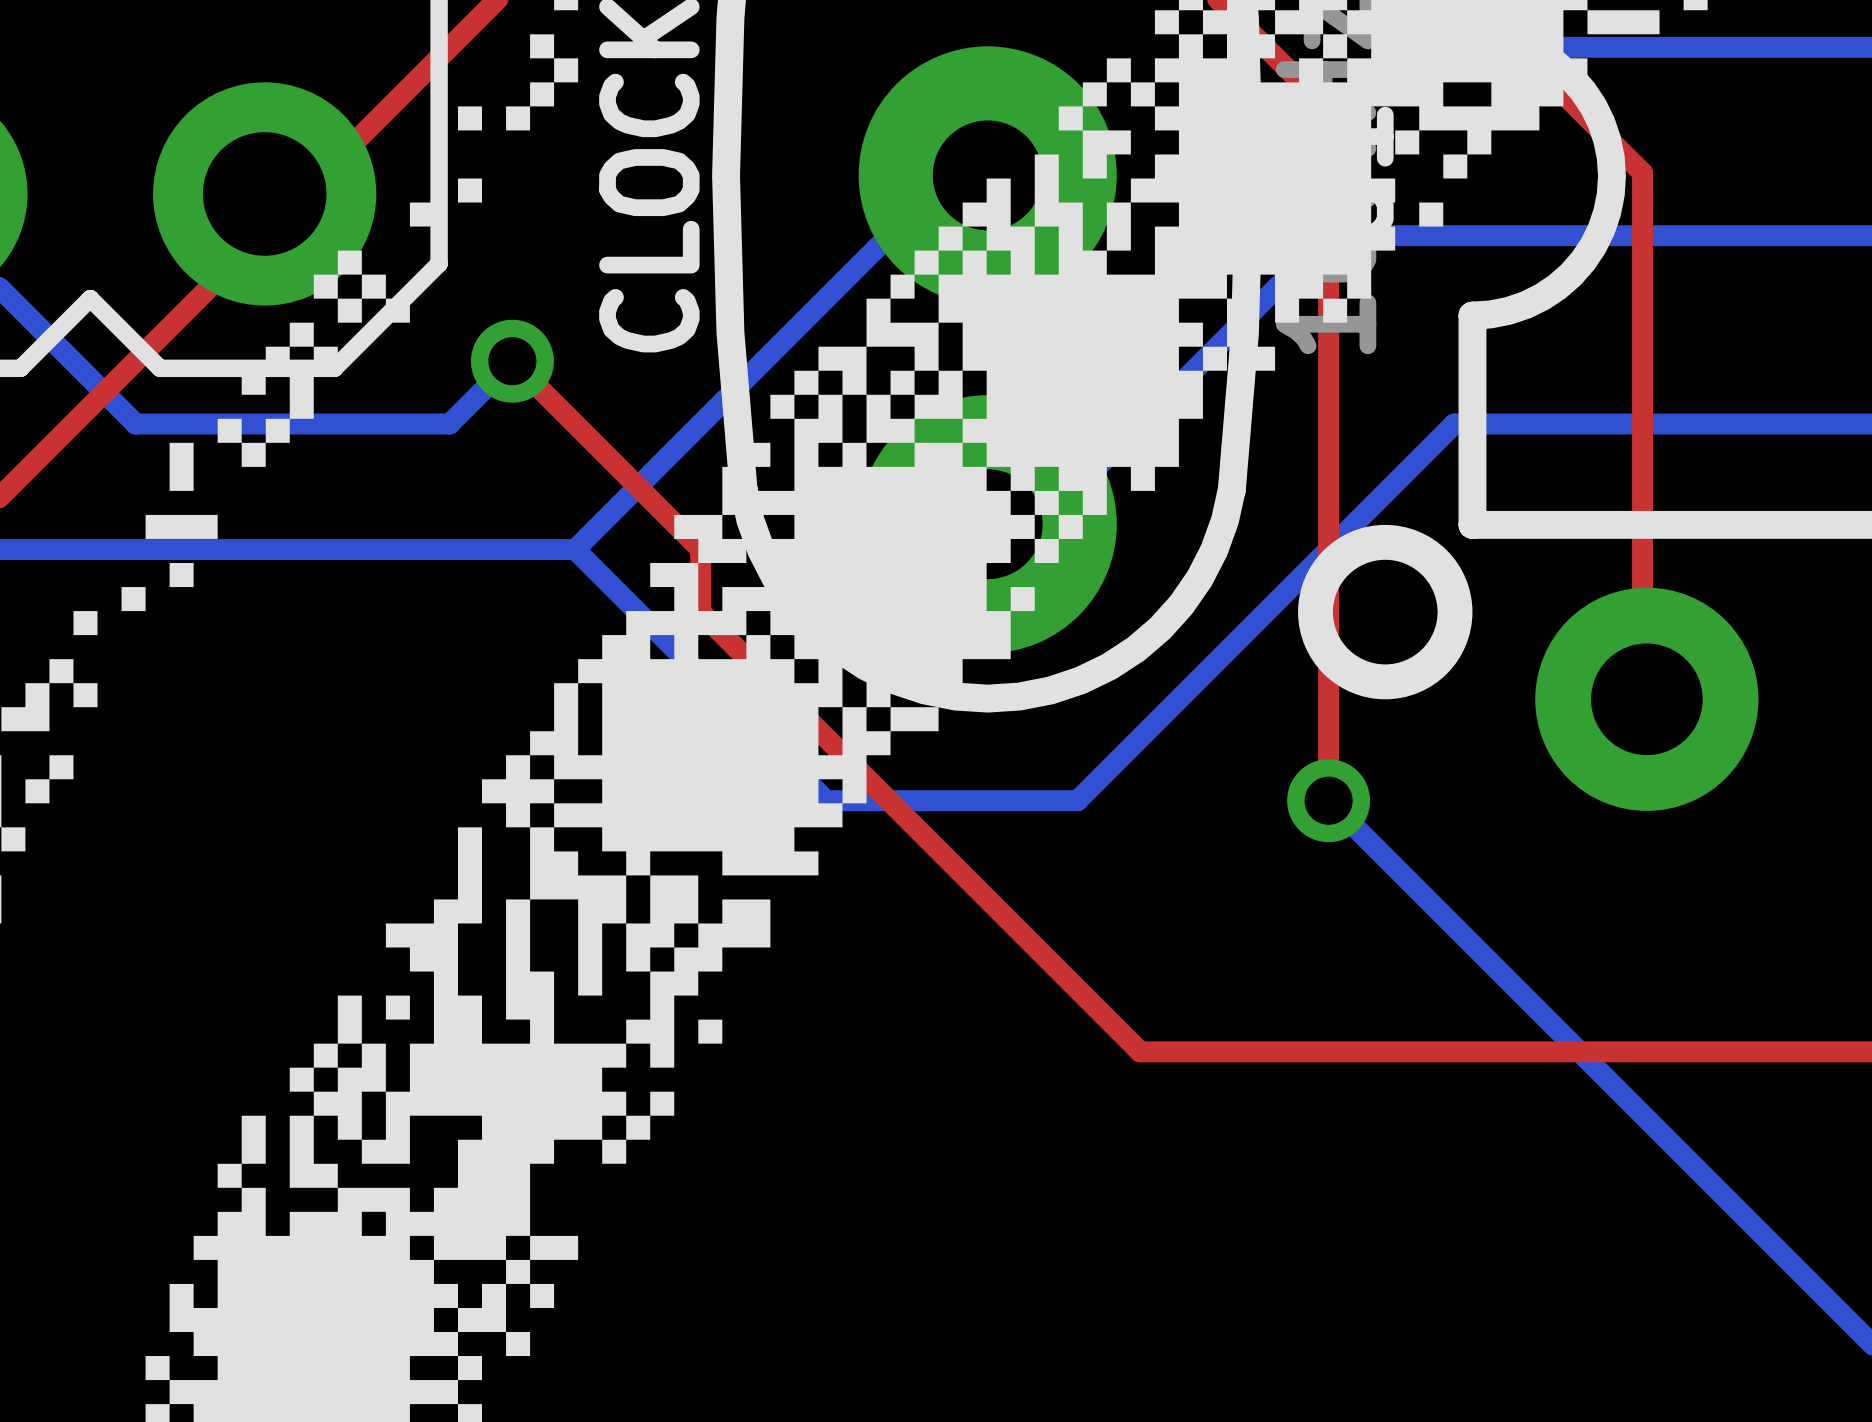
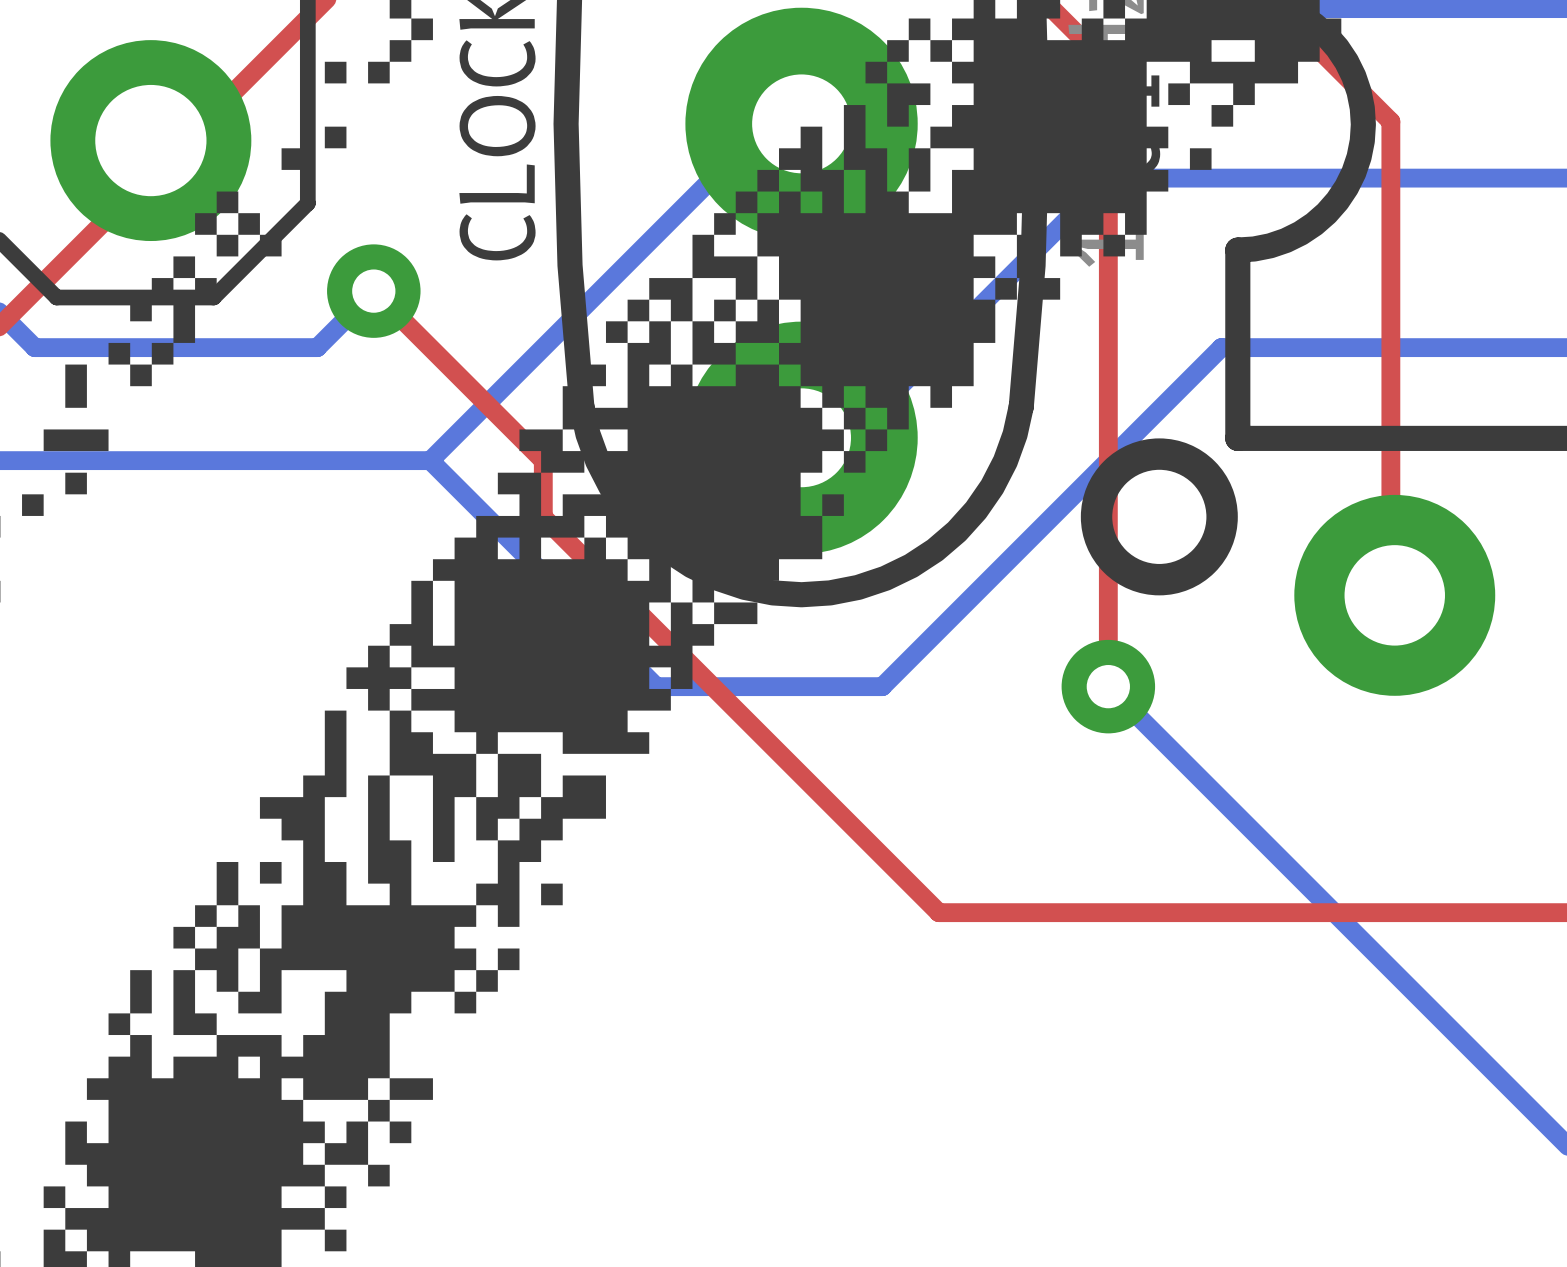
via size: [470, 319, 554, 403] -> [327, 244, 421, 338]
via size: [1287, 759, 1371, 843] -> [1061, 639, 1156, 734]

